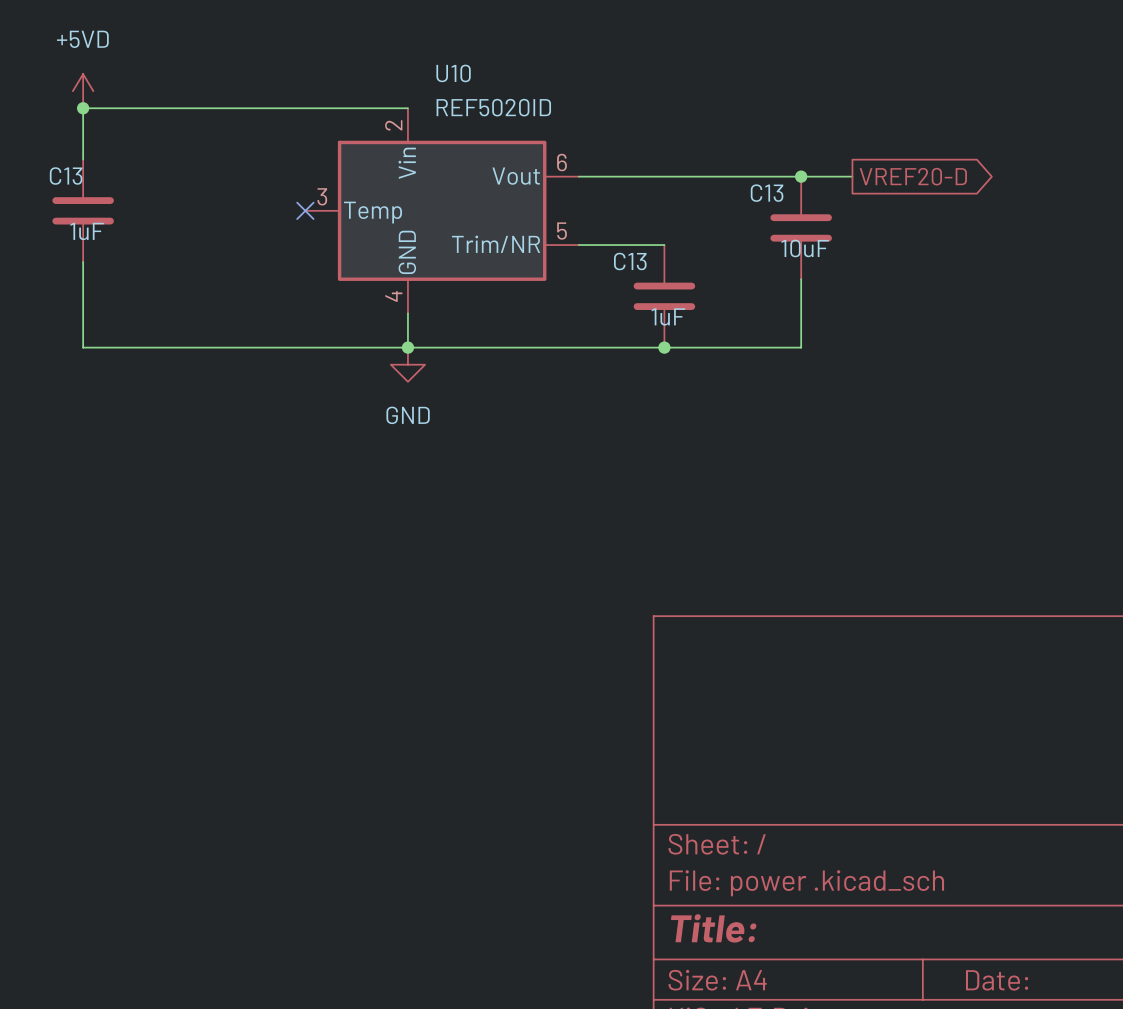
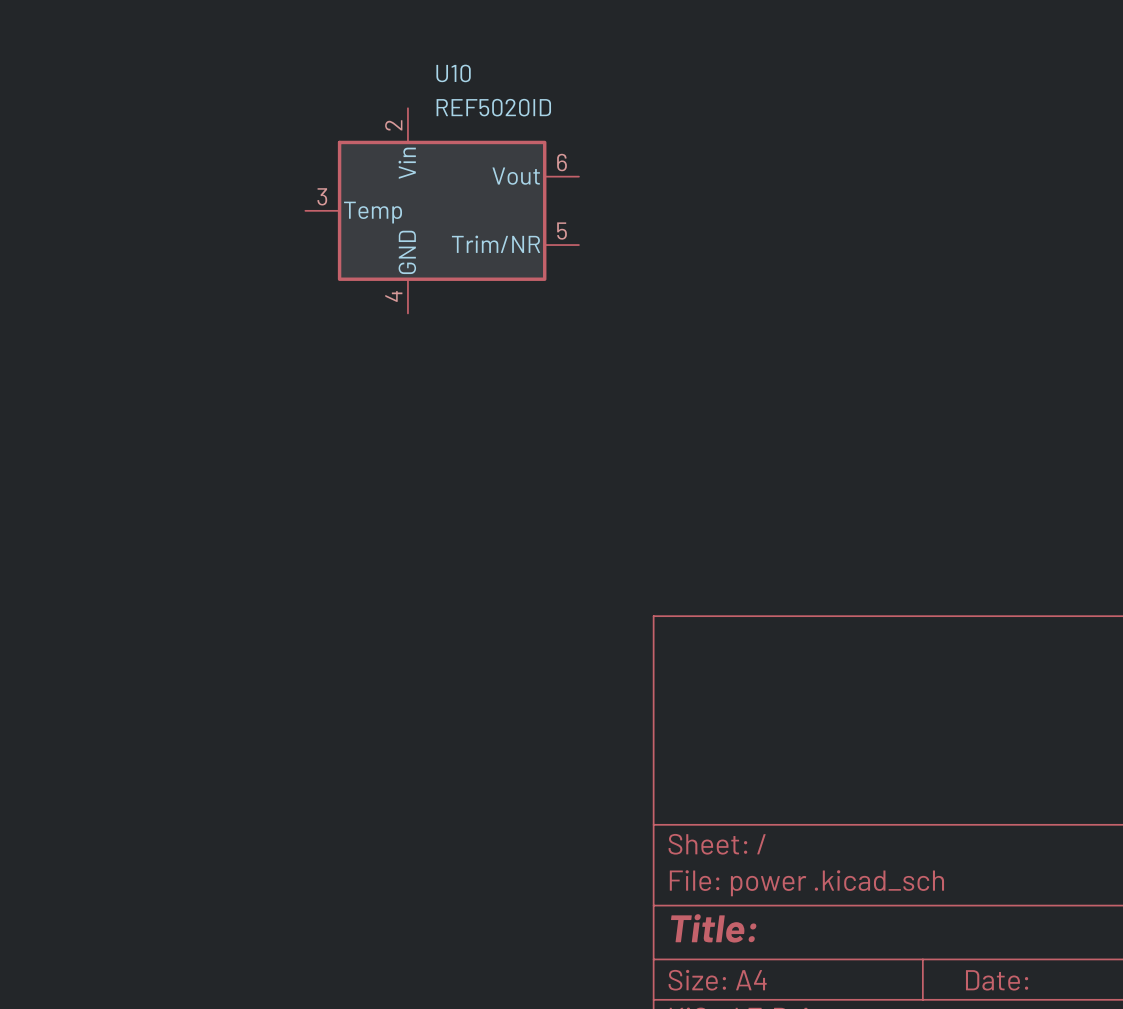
power symbol: +5VD (83, 91) -> none
junction: (83, 108) -> none
wire: (407, 108) (83, 108) (83, 159) -> none
wire: (578, 176) (852, 176) -> none
junction: (801, 176) -> none
global label: VREF20-D (913, 176) -> none
C13: 1uF (83, 210) -> none
no-connect mark: (305, 210) -> none
C13: 10uF (801, 227) -> none
wire: (578, 245) (664, 245) -> none
wire: (83, 262) (83, 347) (801, 347) (801, 279) -> none
C13: 1uF (664, 296) -> none
wire: (407, 313) (407, 347) -> none
junction: (407, 347) -> none
junction: (664, 347) -> none
power symbol: GND (407, 364) -> none

